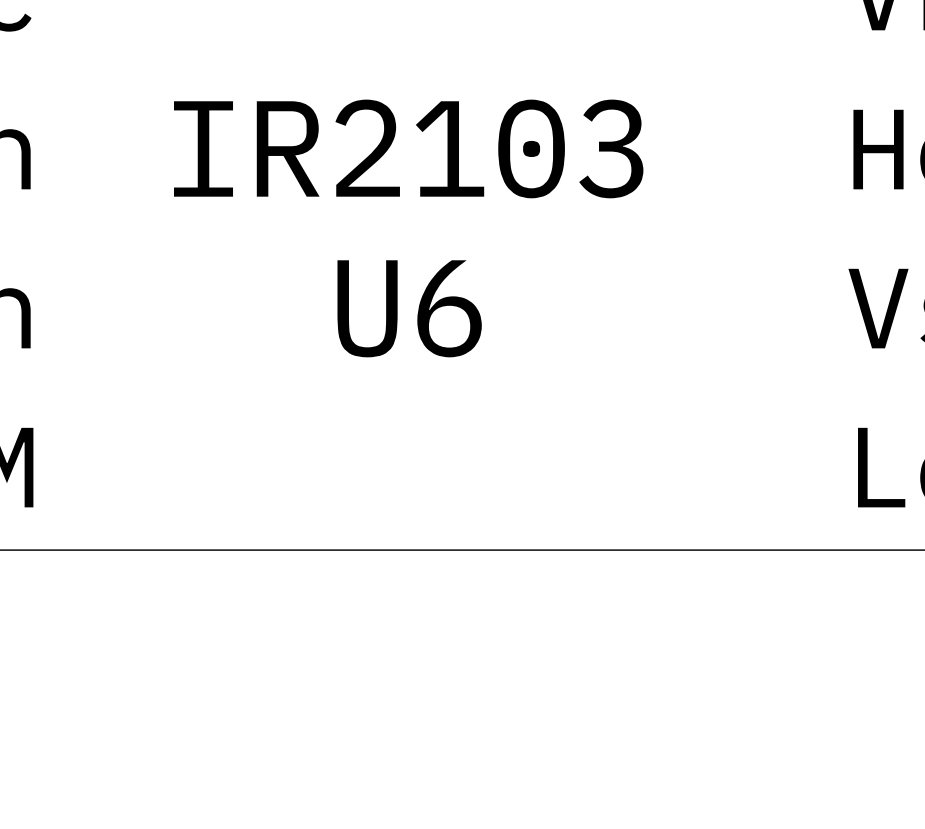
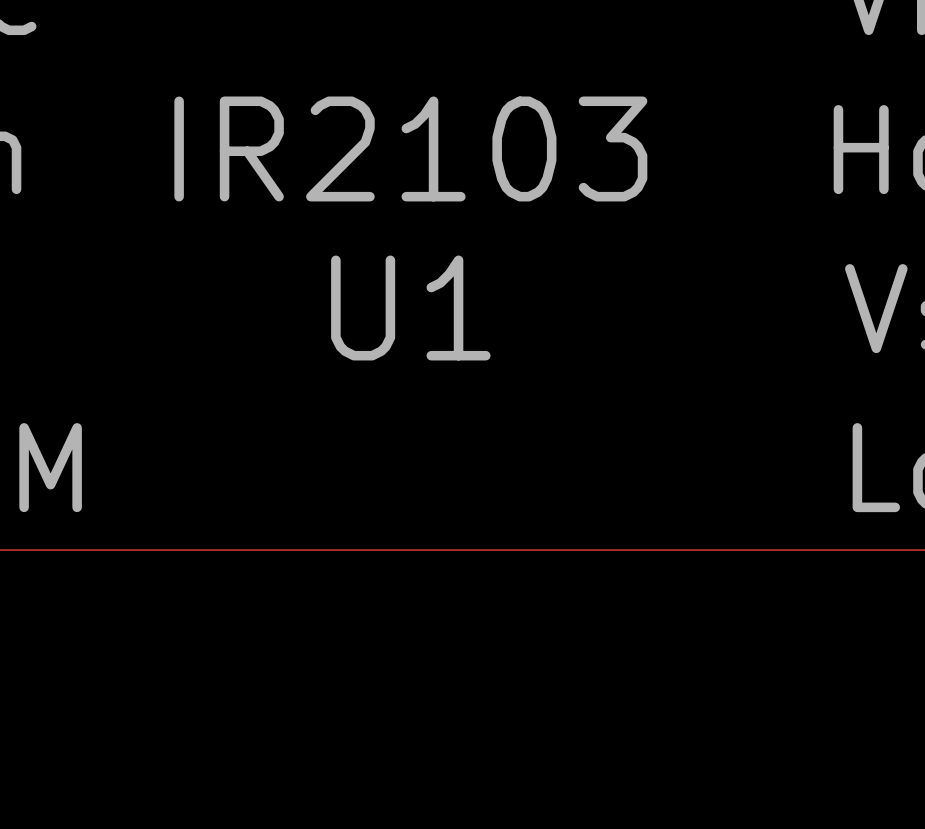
U6 name: U6 (409, 308) -> U1 (410, 307)

